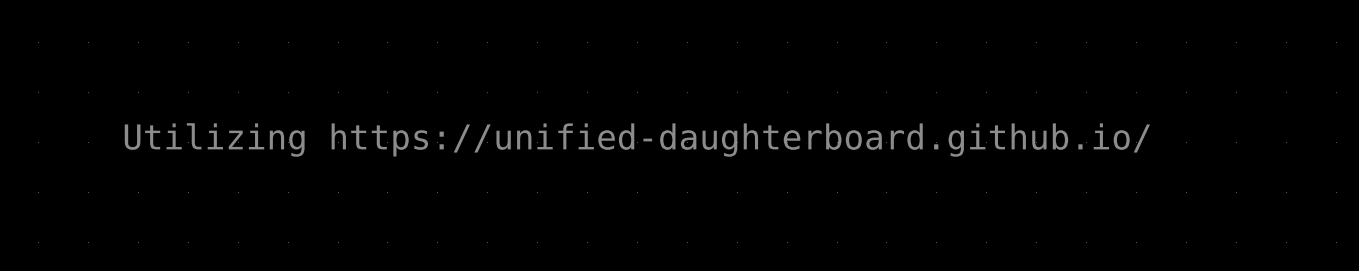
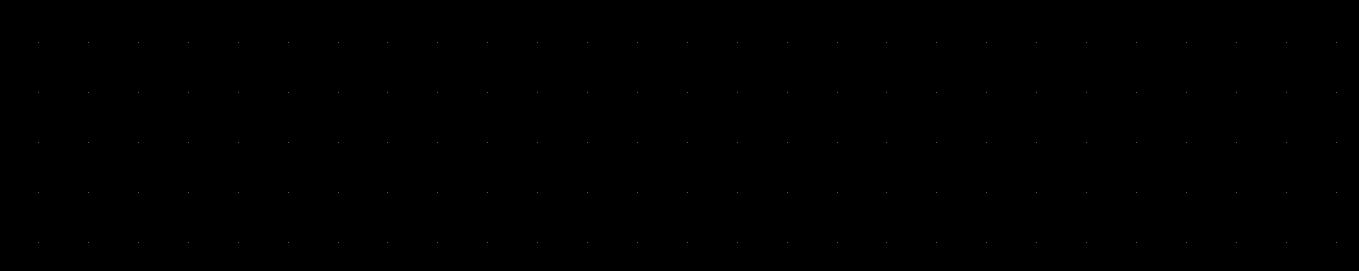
text: Utilizing https://unified-daughterboard.github.io/ (637, 139) -> none

